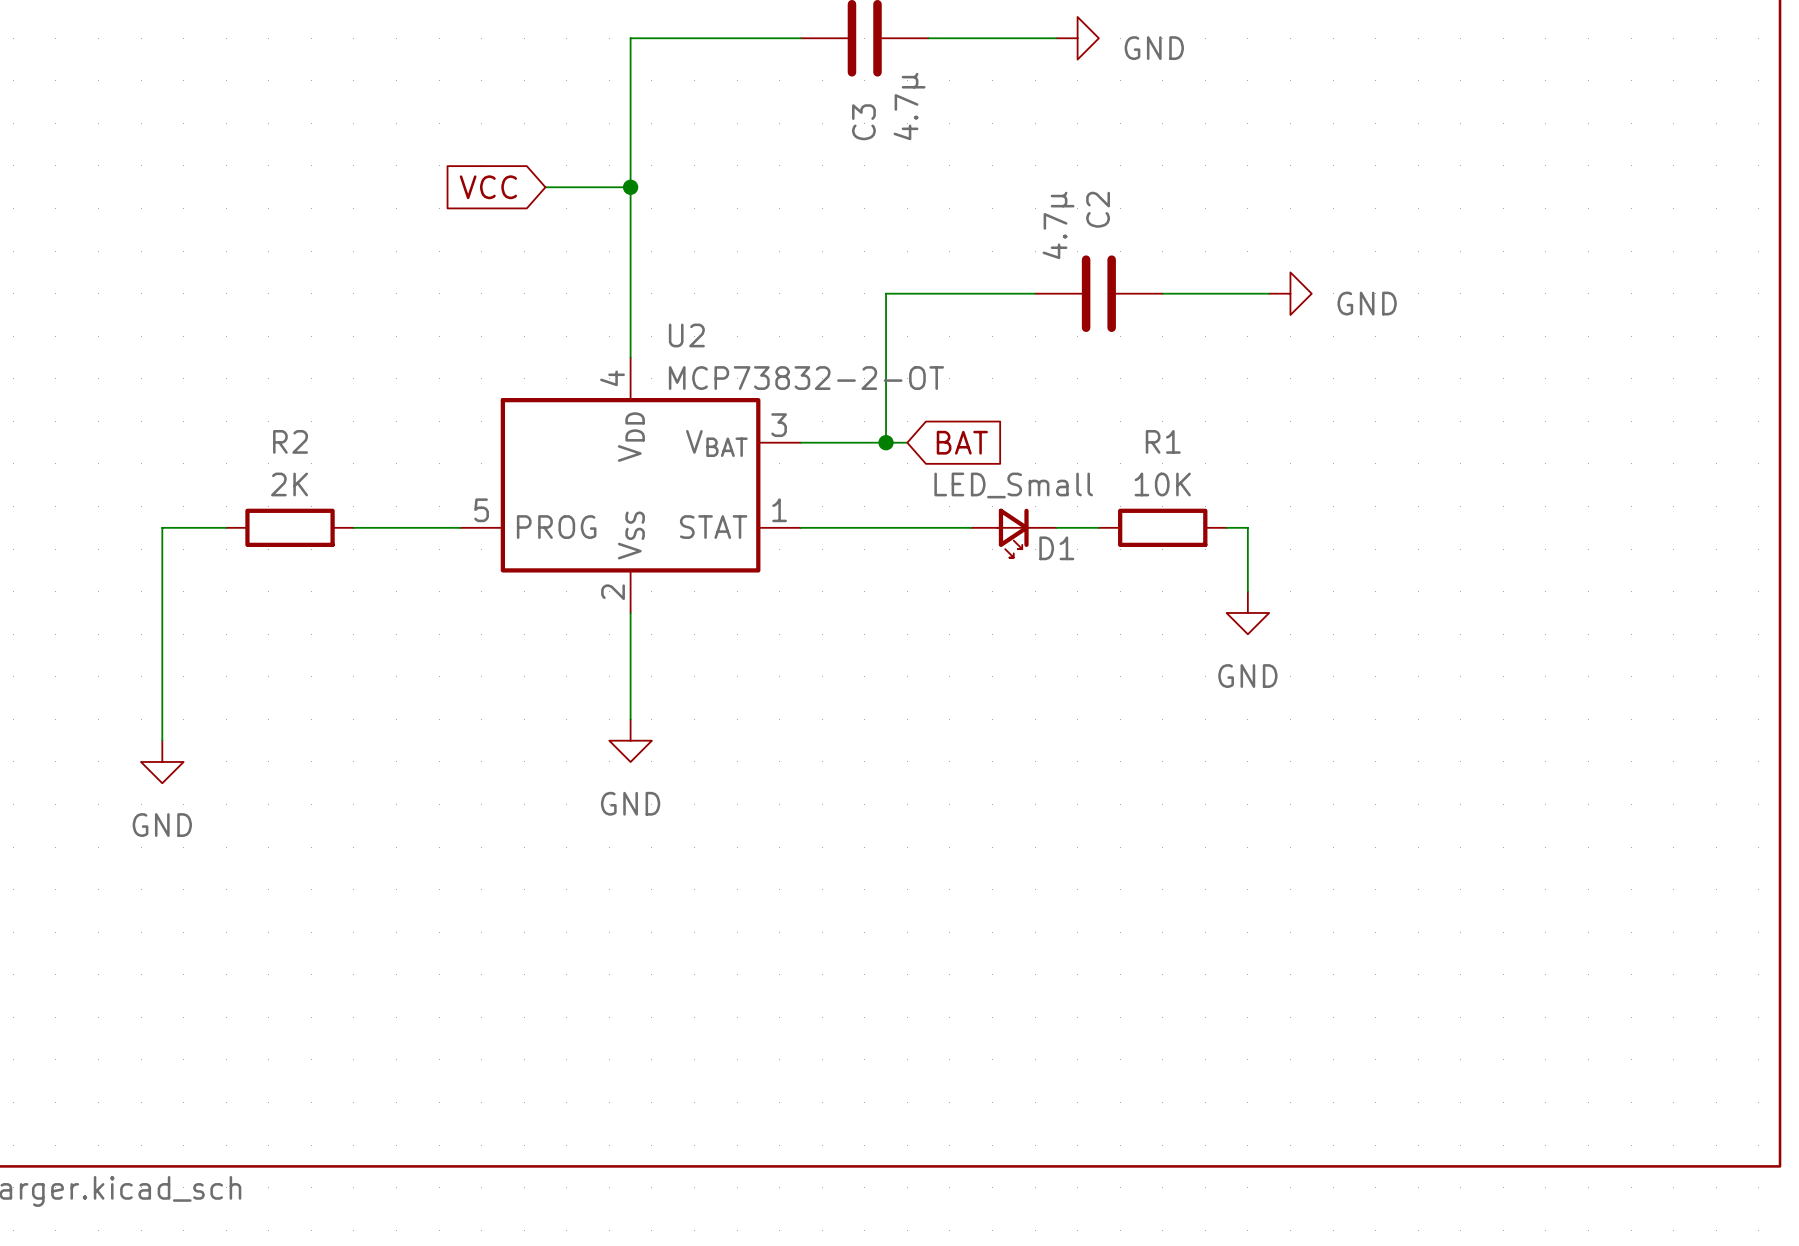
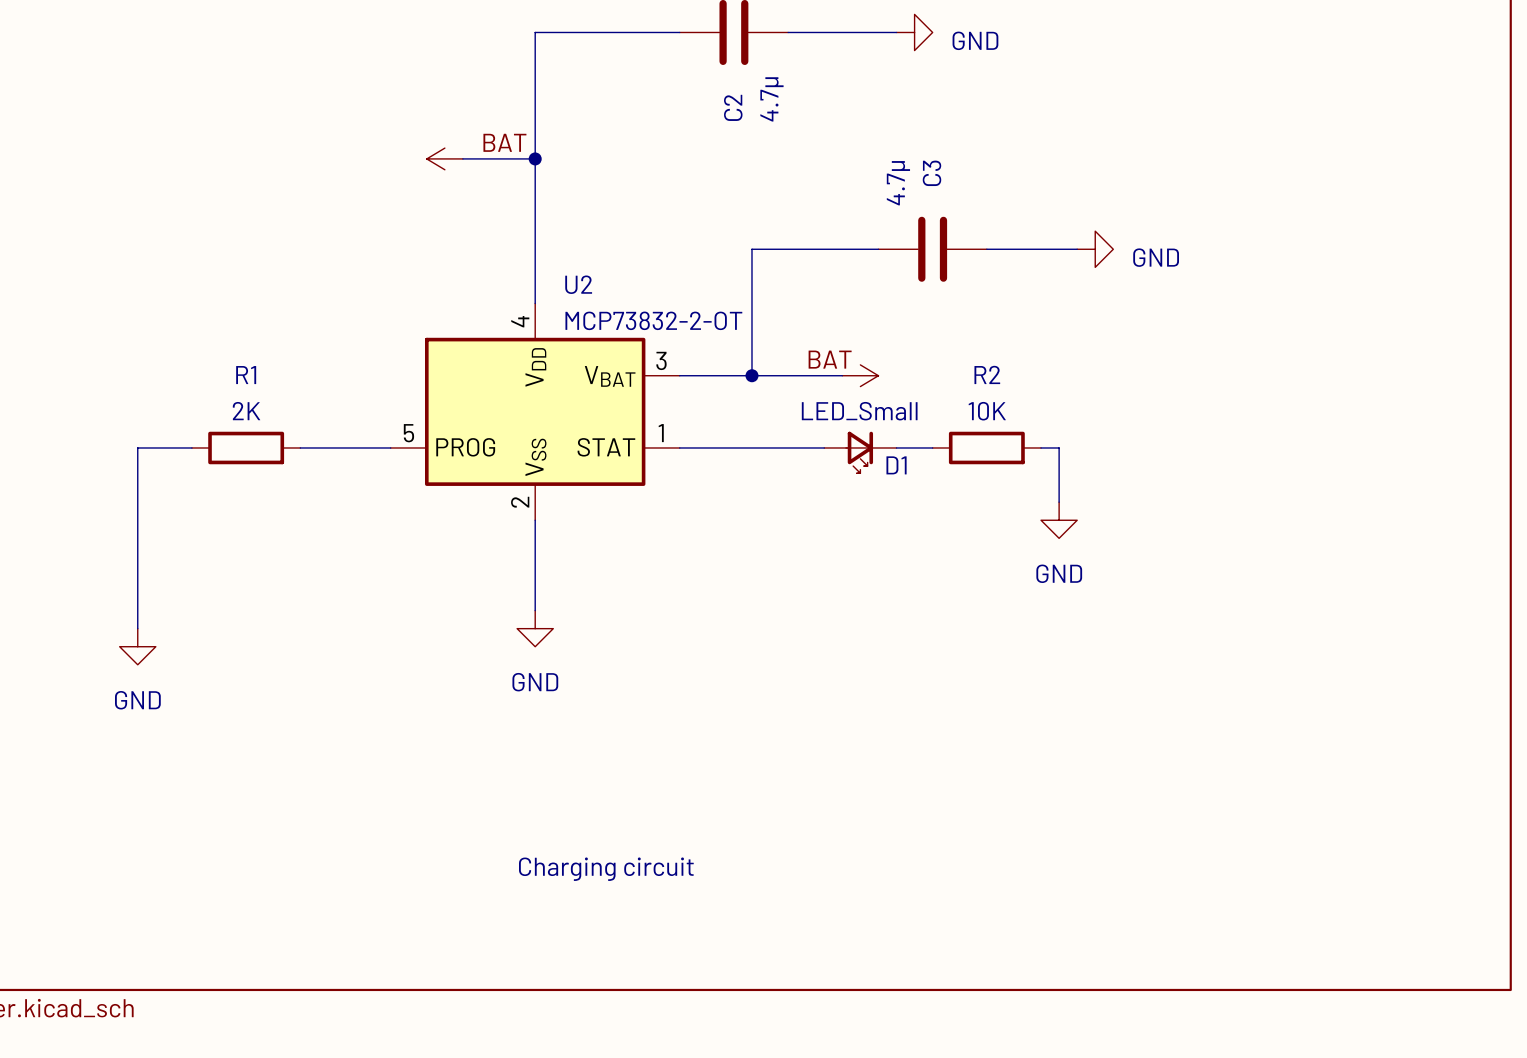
C3 name: C3 (863, 122) -> C2 (733, 107)
label: none -> BAT (504, 142)
global label: VCC (488, 187) -> none
power symbol: none -> (444, 158)
C2 name: C2 (1098, 209) -> C3 (931, 173)
label: none -> BAT (830, 359)
R2 name: R2 (290, 441) -> R1 (246, 375)
R1 name: R1 (1163, 441) -> R2 (987, 374)
wire: none -> (770, 375) (842, 375)
global label: BAT (962, 442) -> none
power symbol: none -> (860, 375)
text: none -> Charging circuit (606, 869)

